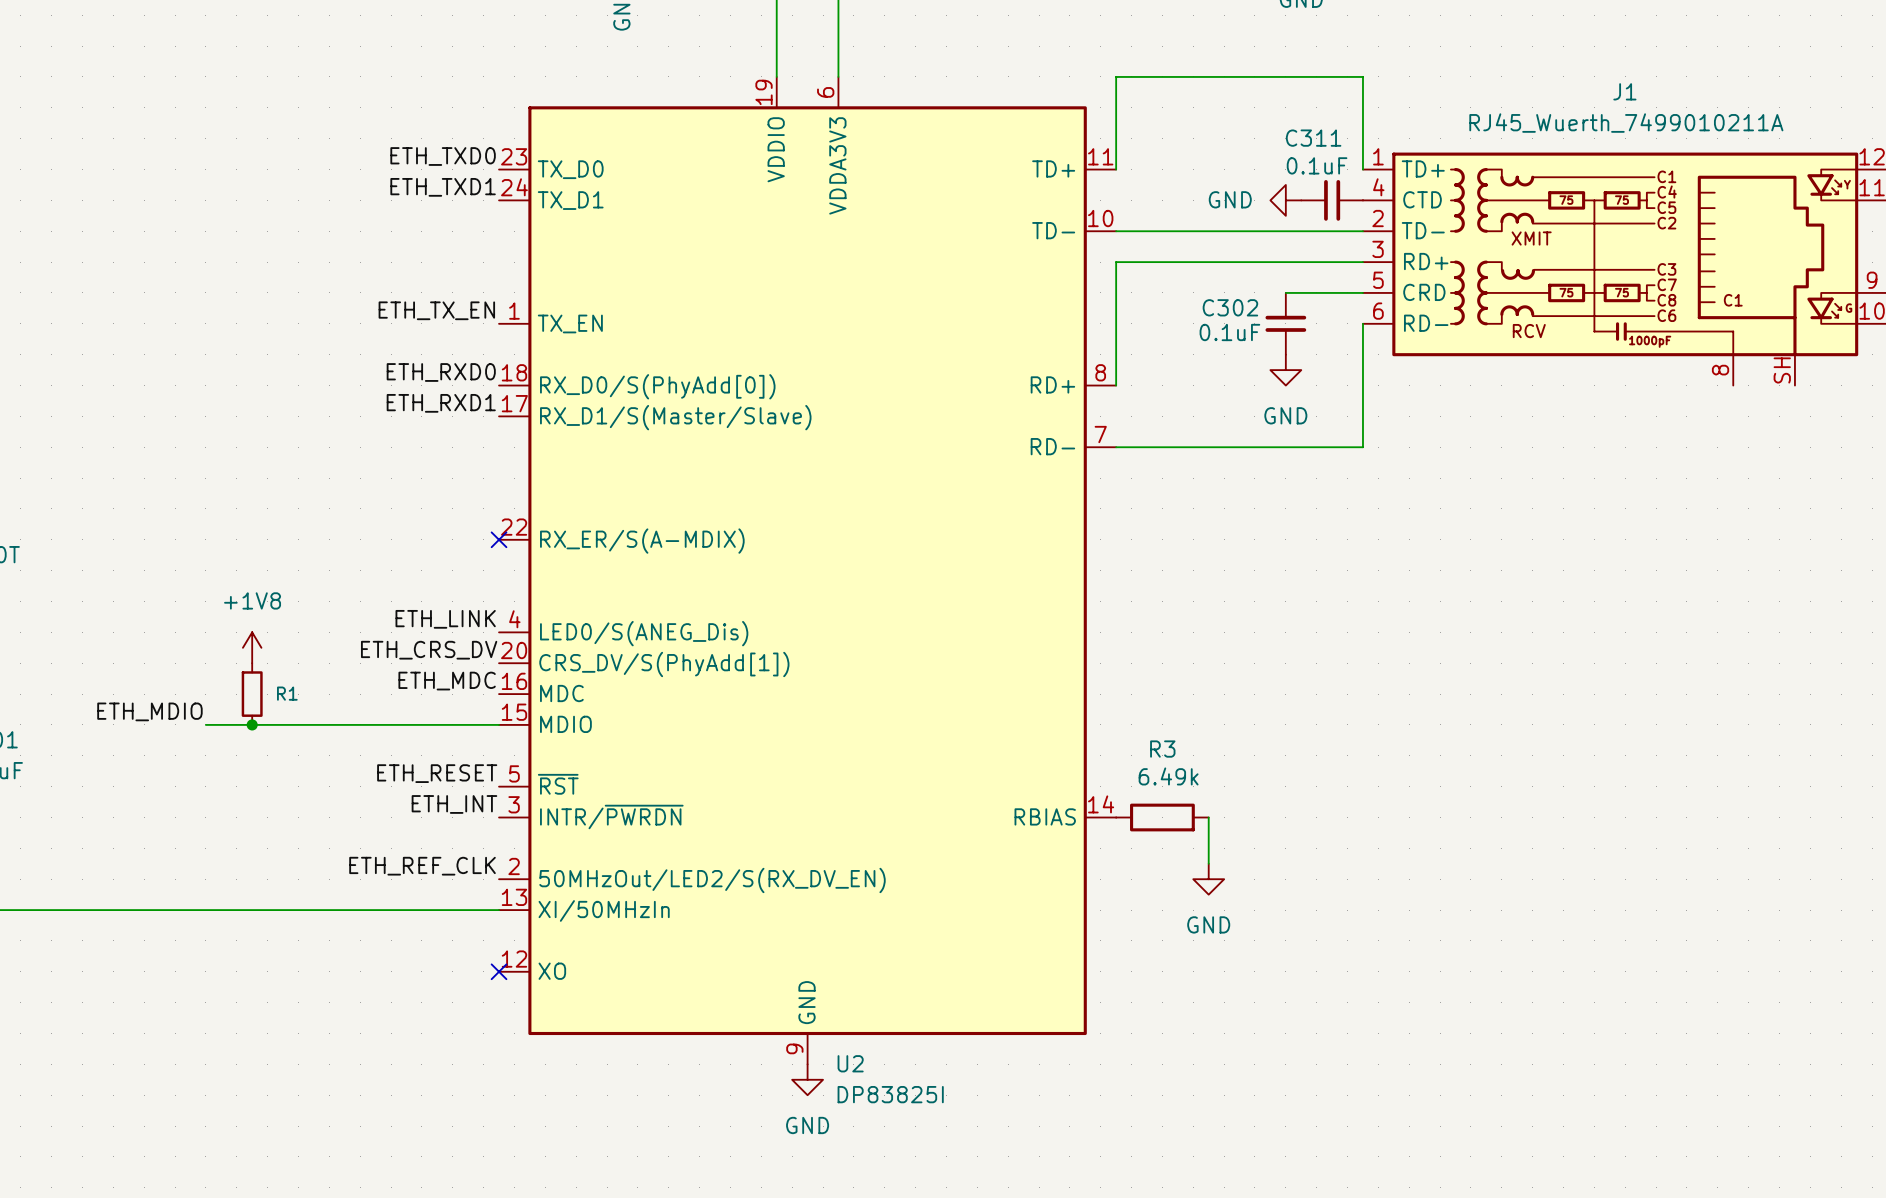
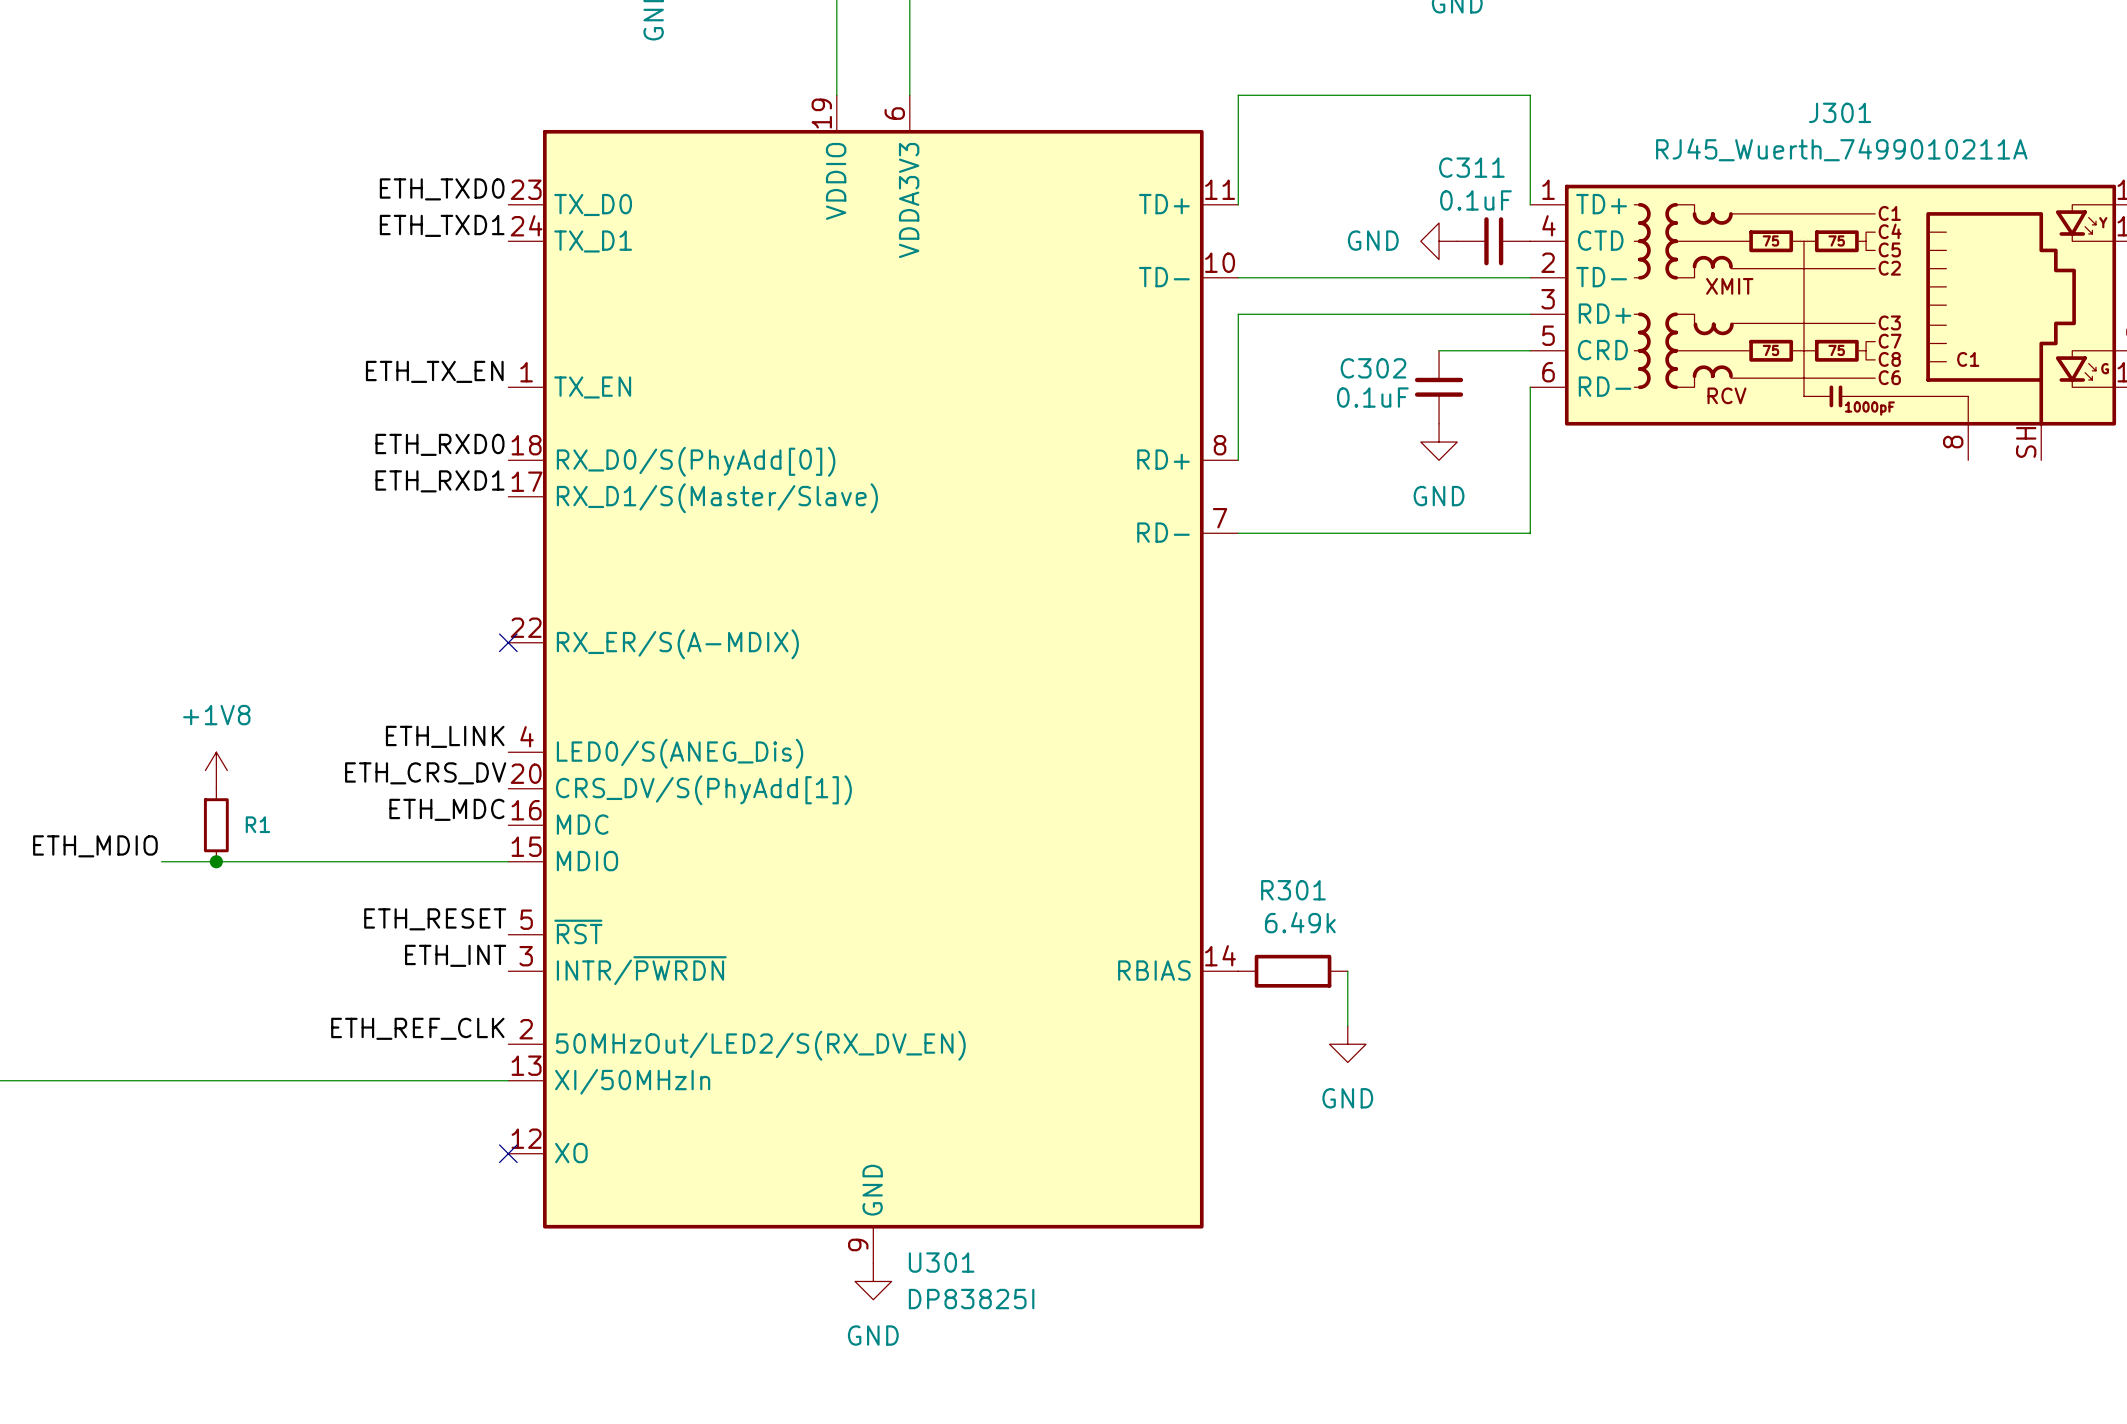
J1 name: J1 (1624, 91) -> J301 (1840, 112)
R3 name: R3 (1162, 749) -> R301 (1293, 890)
U2 name: U2 (850, 1063) -> U301 (941, 1262)

